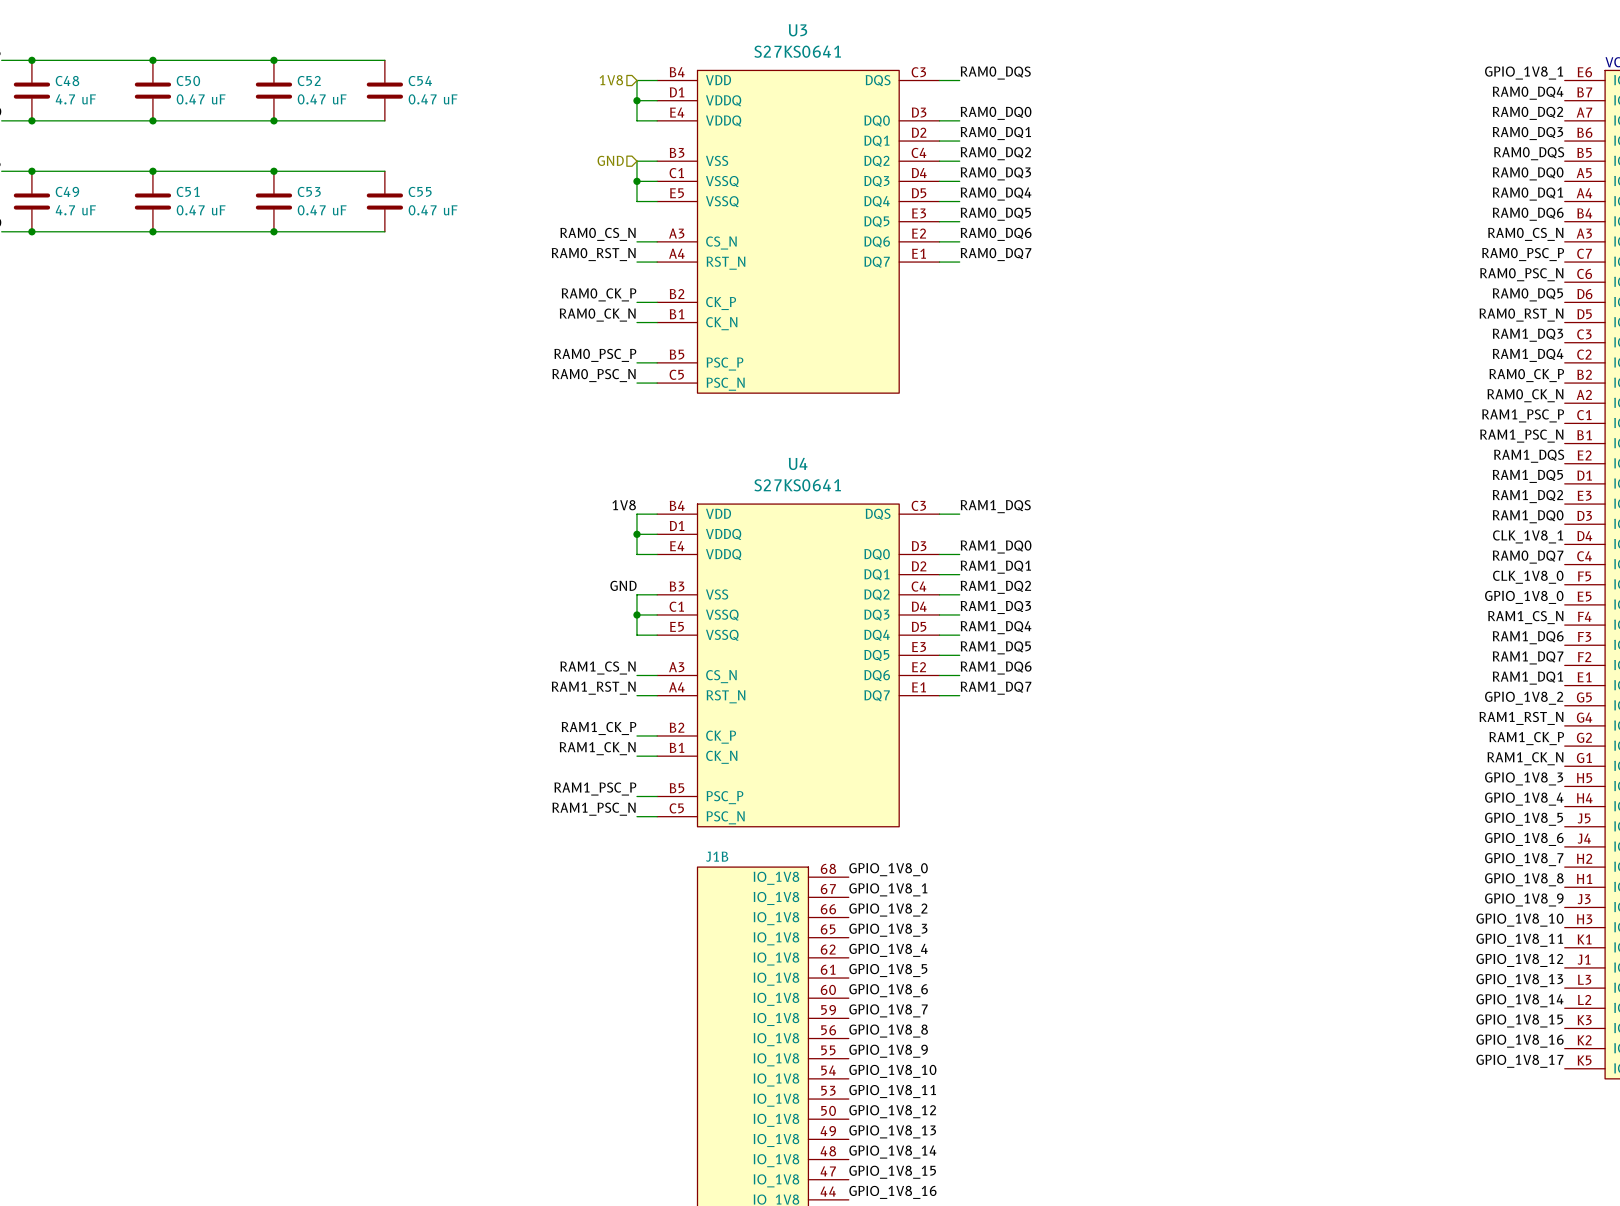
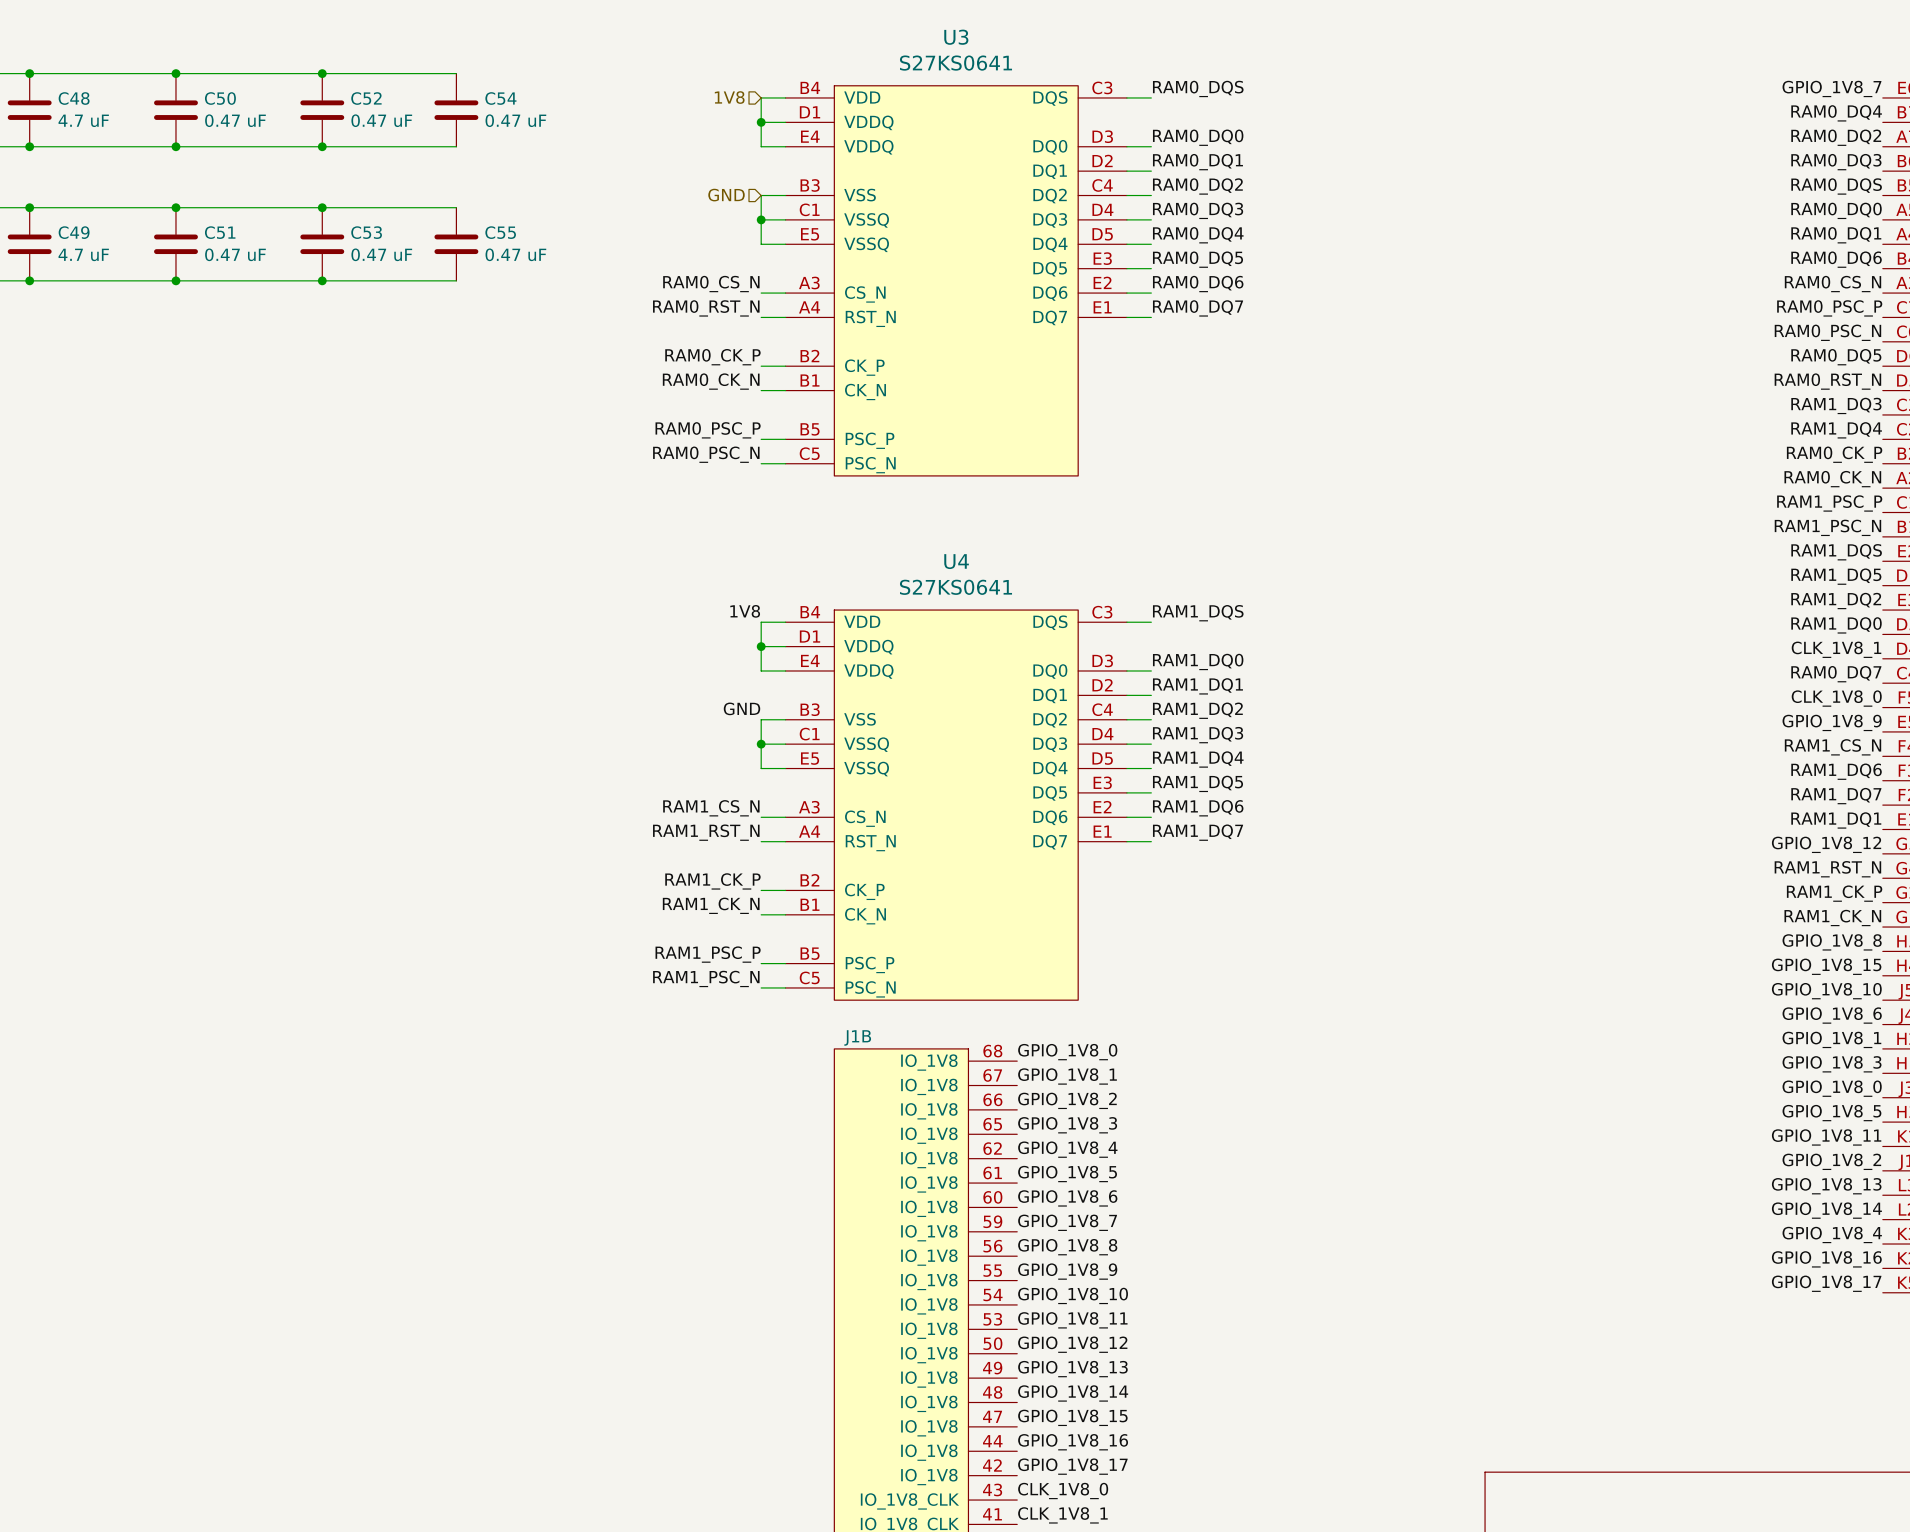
label: GPIO_1V8_1 (1524, 73) -> GPIO_1V8_7 (1831, 88)
label: GPIO_1V8_0 (1524, 597) -> GPIO_1V8_9 (1832, 722)
label: GPIO_1V8_2 (1524, 698) -> GPIO_1V8_12 (1826, 844)
label: GPIO_1V8_3 (1524, 778) -> GPIO_1V8_8 (1832, 942)
label: GPIO_1V8_4 (1524, 799) -> GPIO_1V8_15 (1826, 966)
label: GPIO_1V8_5 (1524, 819) -> GPIO_1V8_10 (1826, 991)
label: GPIO_1V8_7 (1524, 859) -> GPIO_1V8_1 (1831, 1039)
label: GPIO_1V8_8 (1524, 879) -> GPIO_1V8_3 (1832, 1064)
label: GPIO_1V8_9 (1524, 899) -> GPIO_1V8_0 (1832, 1088)
label: GPIO_1V8_10 (1519, 920) -> GPIO_1V8_5 (1831, 1113)
label: GPIO_1V8_12 (1519, 960) -> GPIO_1V8_2 (1831, 1161)
label: GPIO_1V8_15 (1519, 1020) -> GPIO_1V8_4 (1832, 1234)

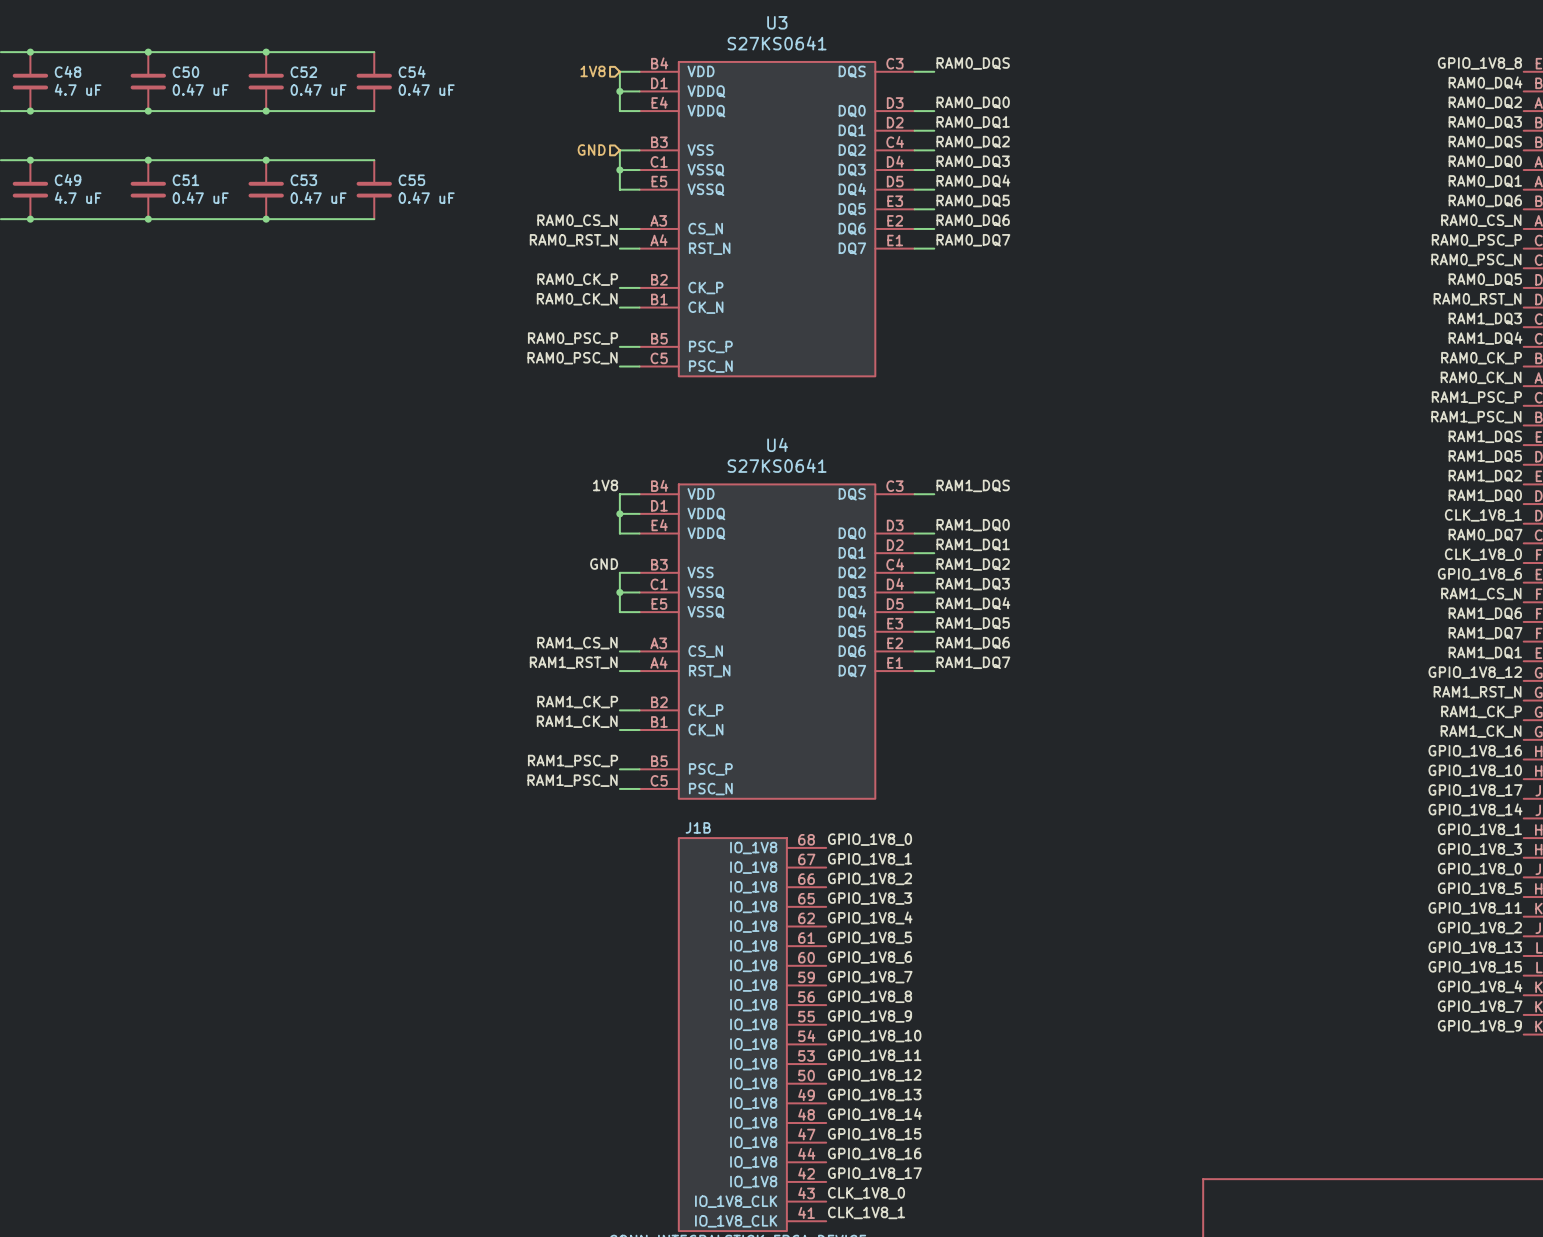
label: GPIO_1V8_7 (1831, 88) -> GPIO_1V8_8 (1479, 63)
label: GPIO_1V8_9 (1832, 722) -> GPIO_1V8_6 (1479, 574)
label: GPIO_1V8_8 (1832, 942) -> GPIO_1V8_16 (1475, 751)
label: GPIO_1V8_15 (1826, 966) -> GPIO_1V8_10 (1475, 770)
label: GPIO_1V8_10 (1826, 991) -> GPIO_1V8_17 (1475, 790)
label: GPIO_1V8_6 (1832, 1015) -> GPIO_1V8_14 (1475, 809)
label: GPIO_1V8_14 (1826, 1210) -> GPIO_1V8_15 (1475, 967)
label: GPIO_1V8_16 (1826, 1259) -> GPIO_1V8_7 (1480, 1006)
label: GPIO_1V8_17 (1826, 1283) -> GPIO_1V8_9 (1479, 1026)

